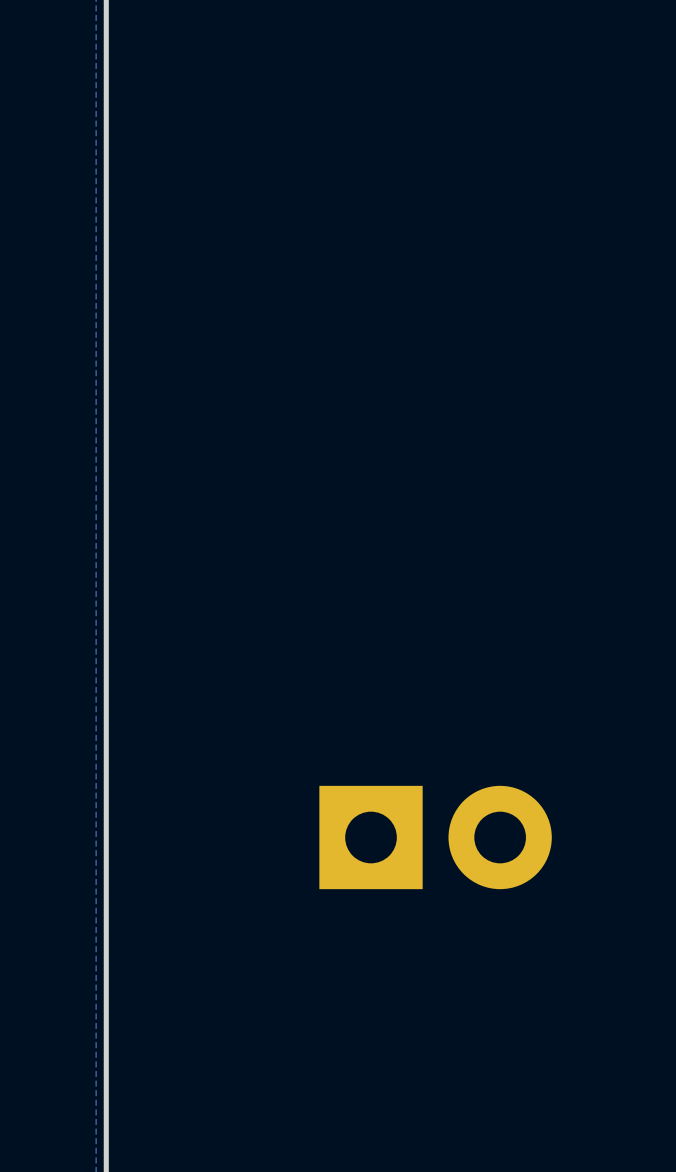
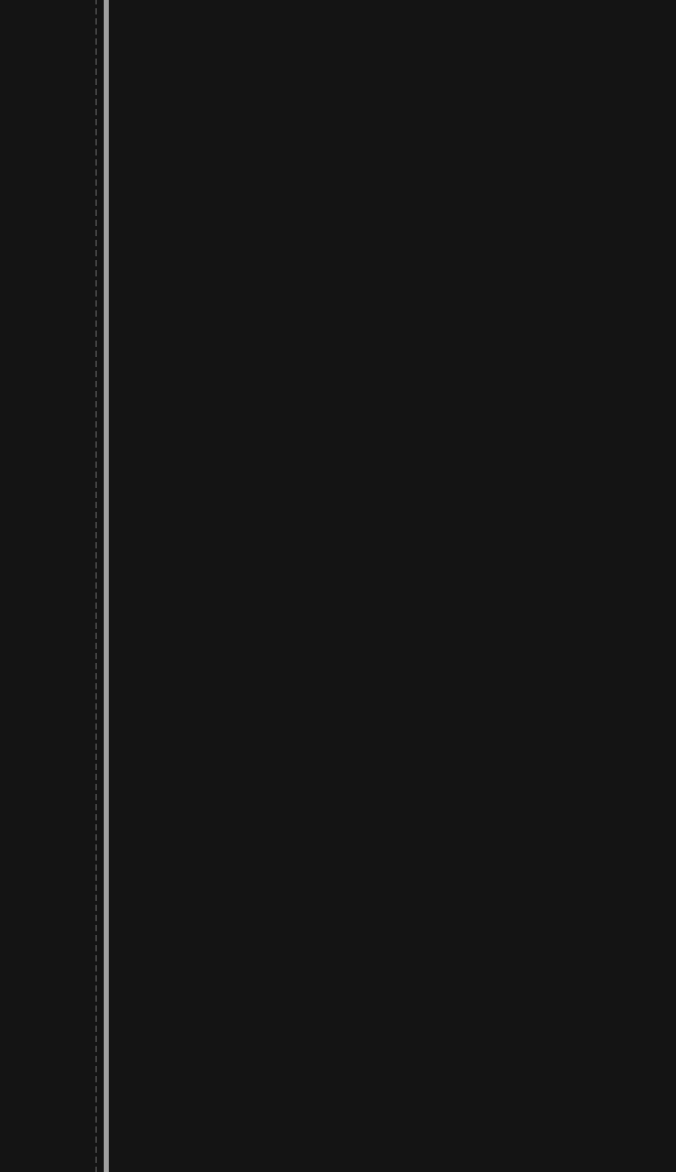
part: (435, 837) -> none

